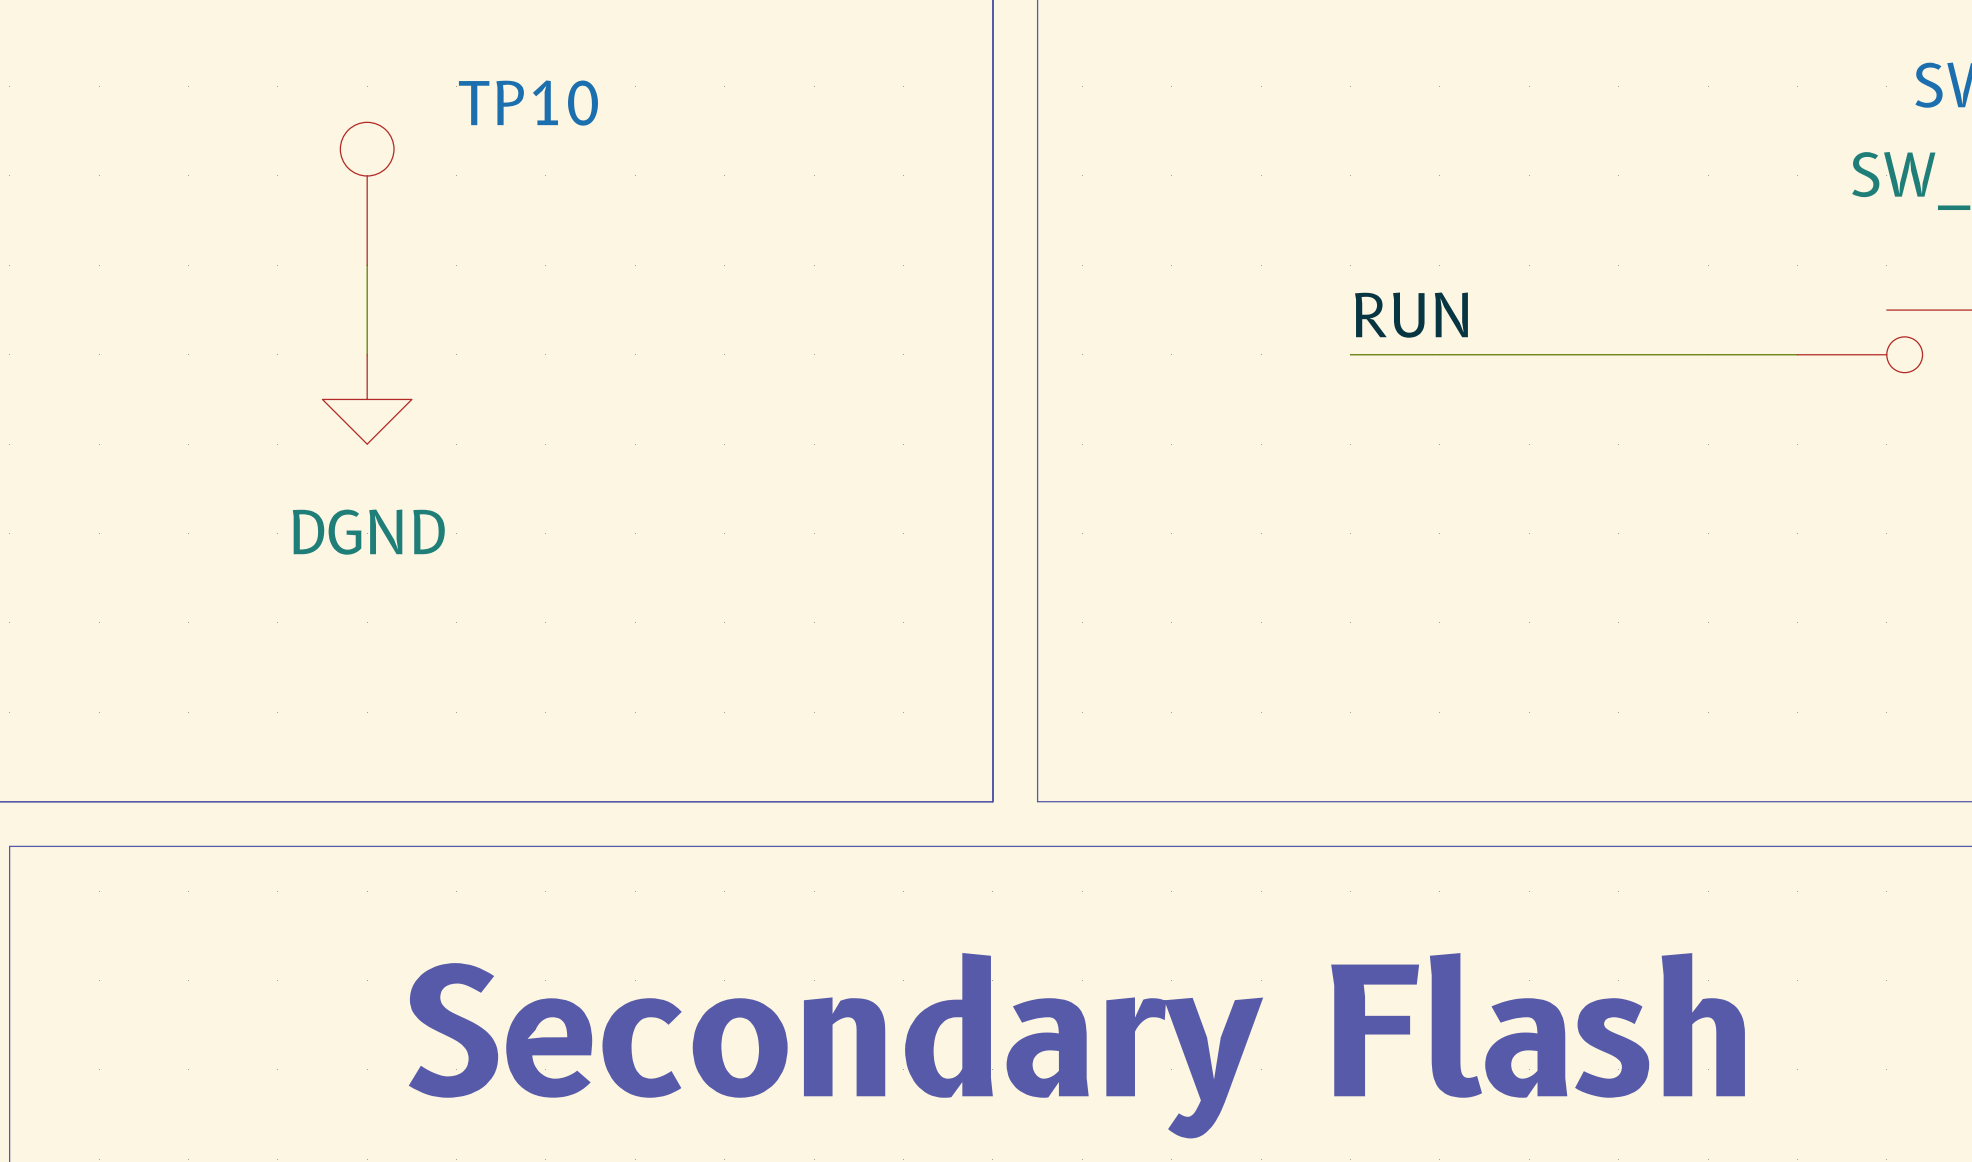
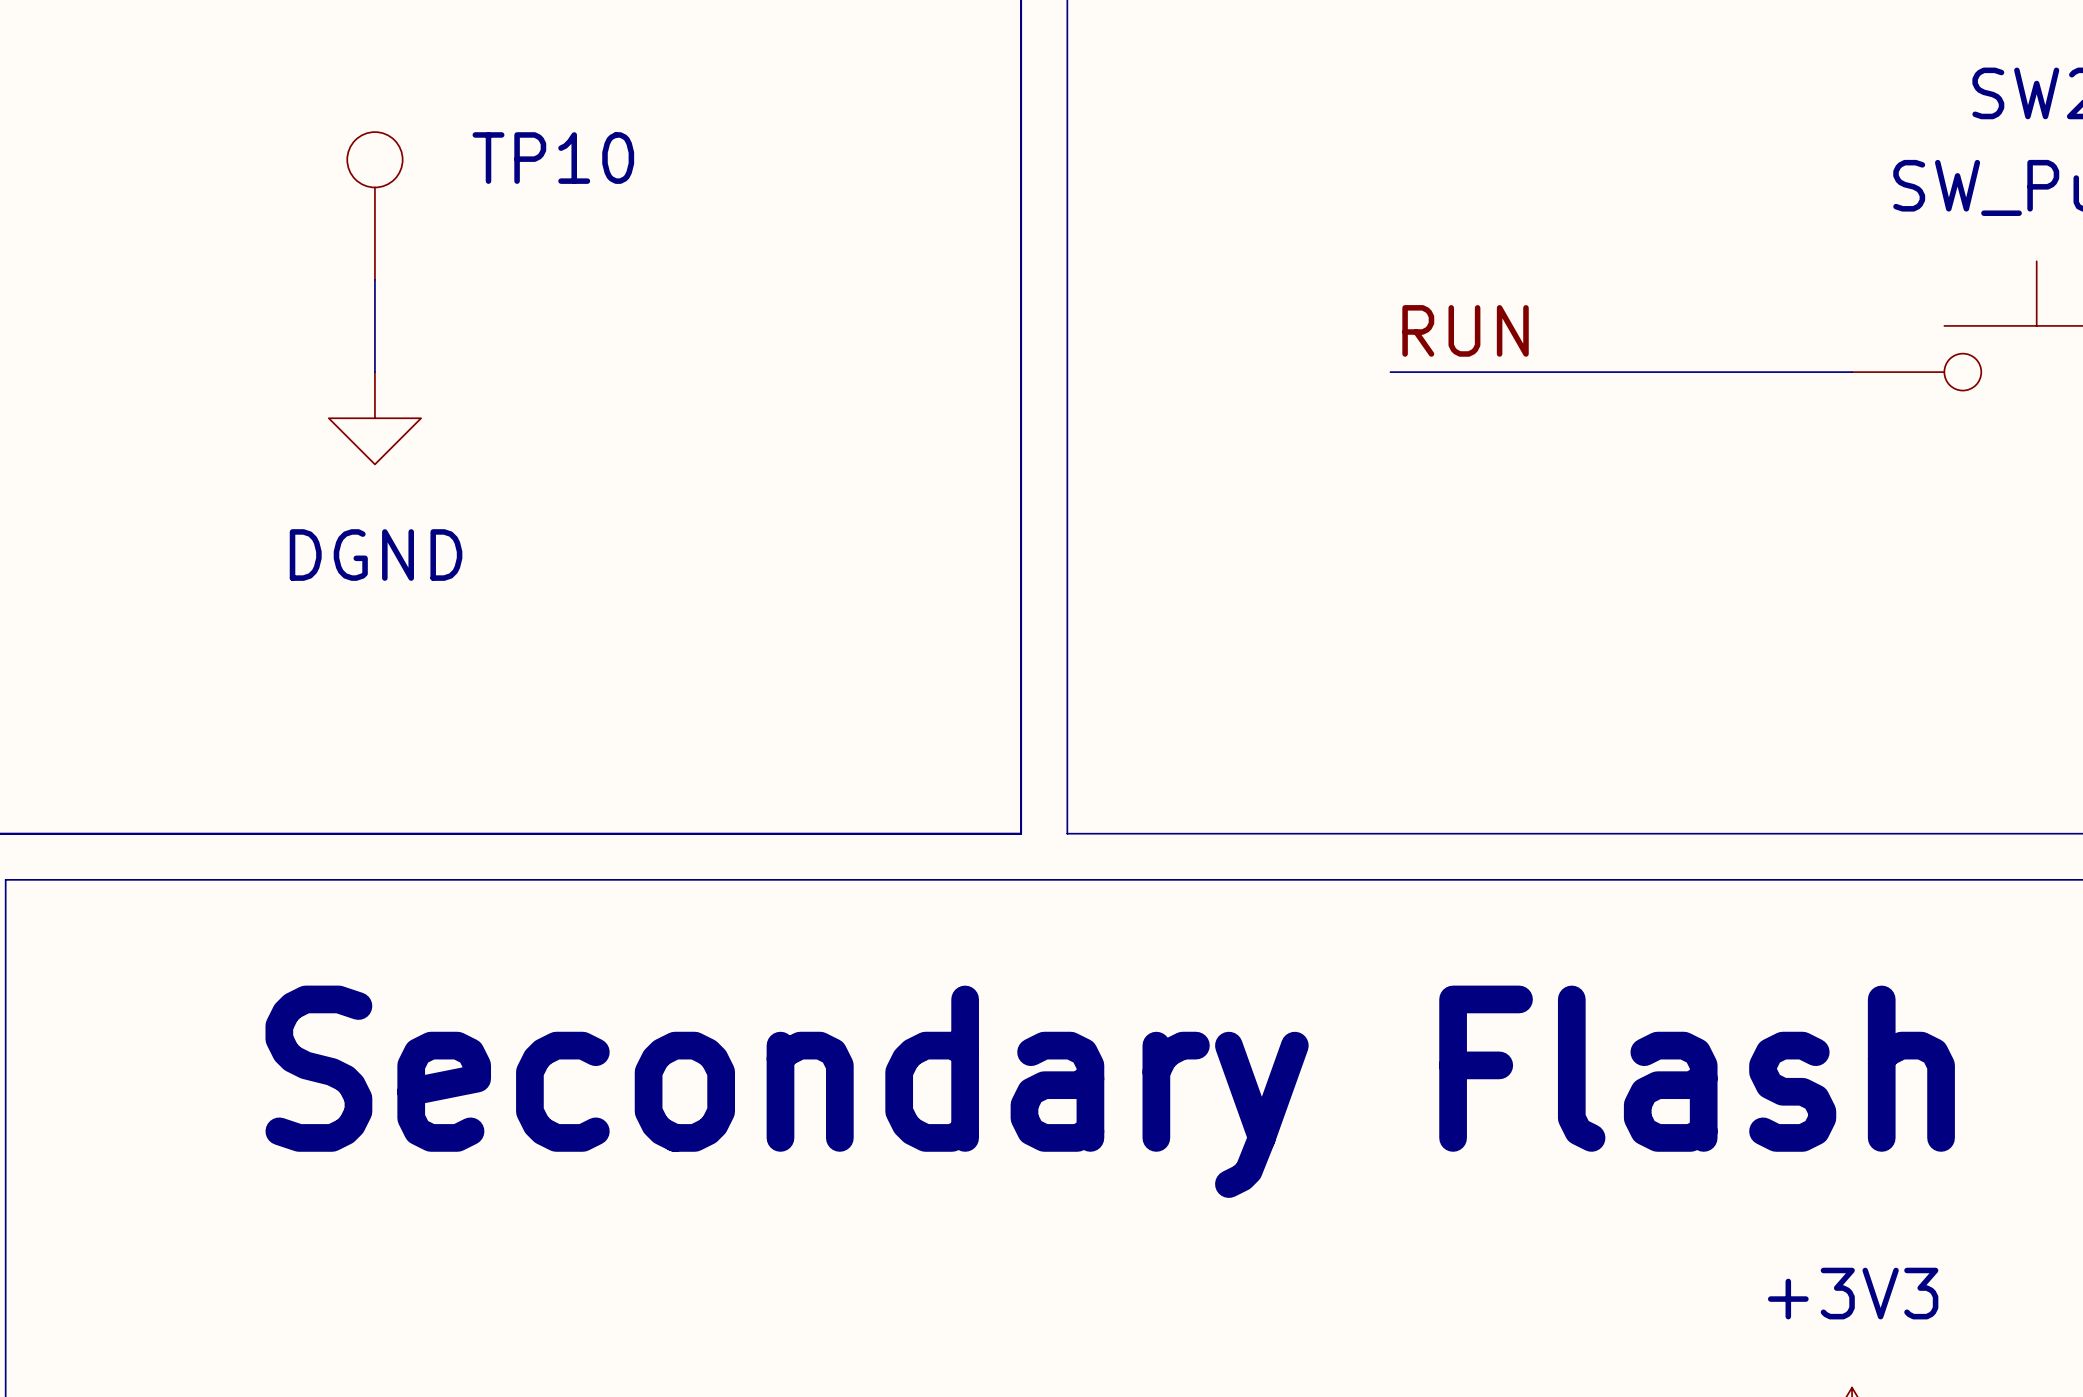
TP10 name position: TP10 (528, 103) -> TP10 (553, 158)

